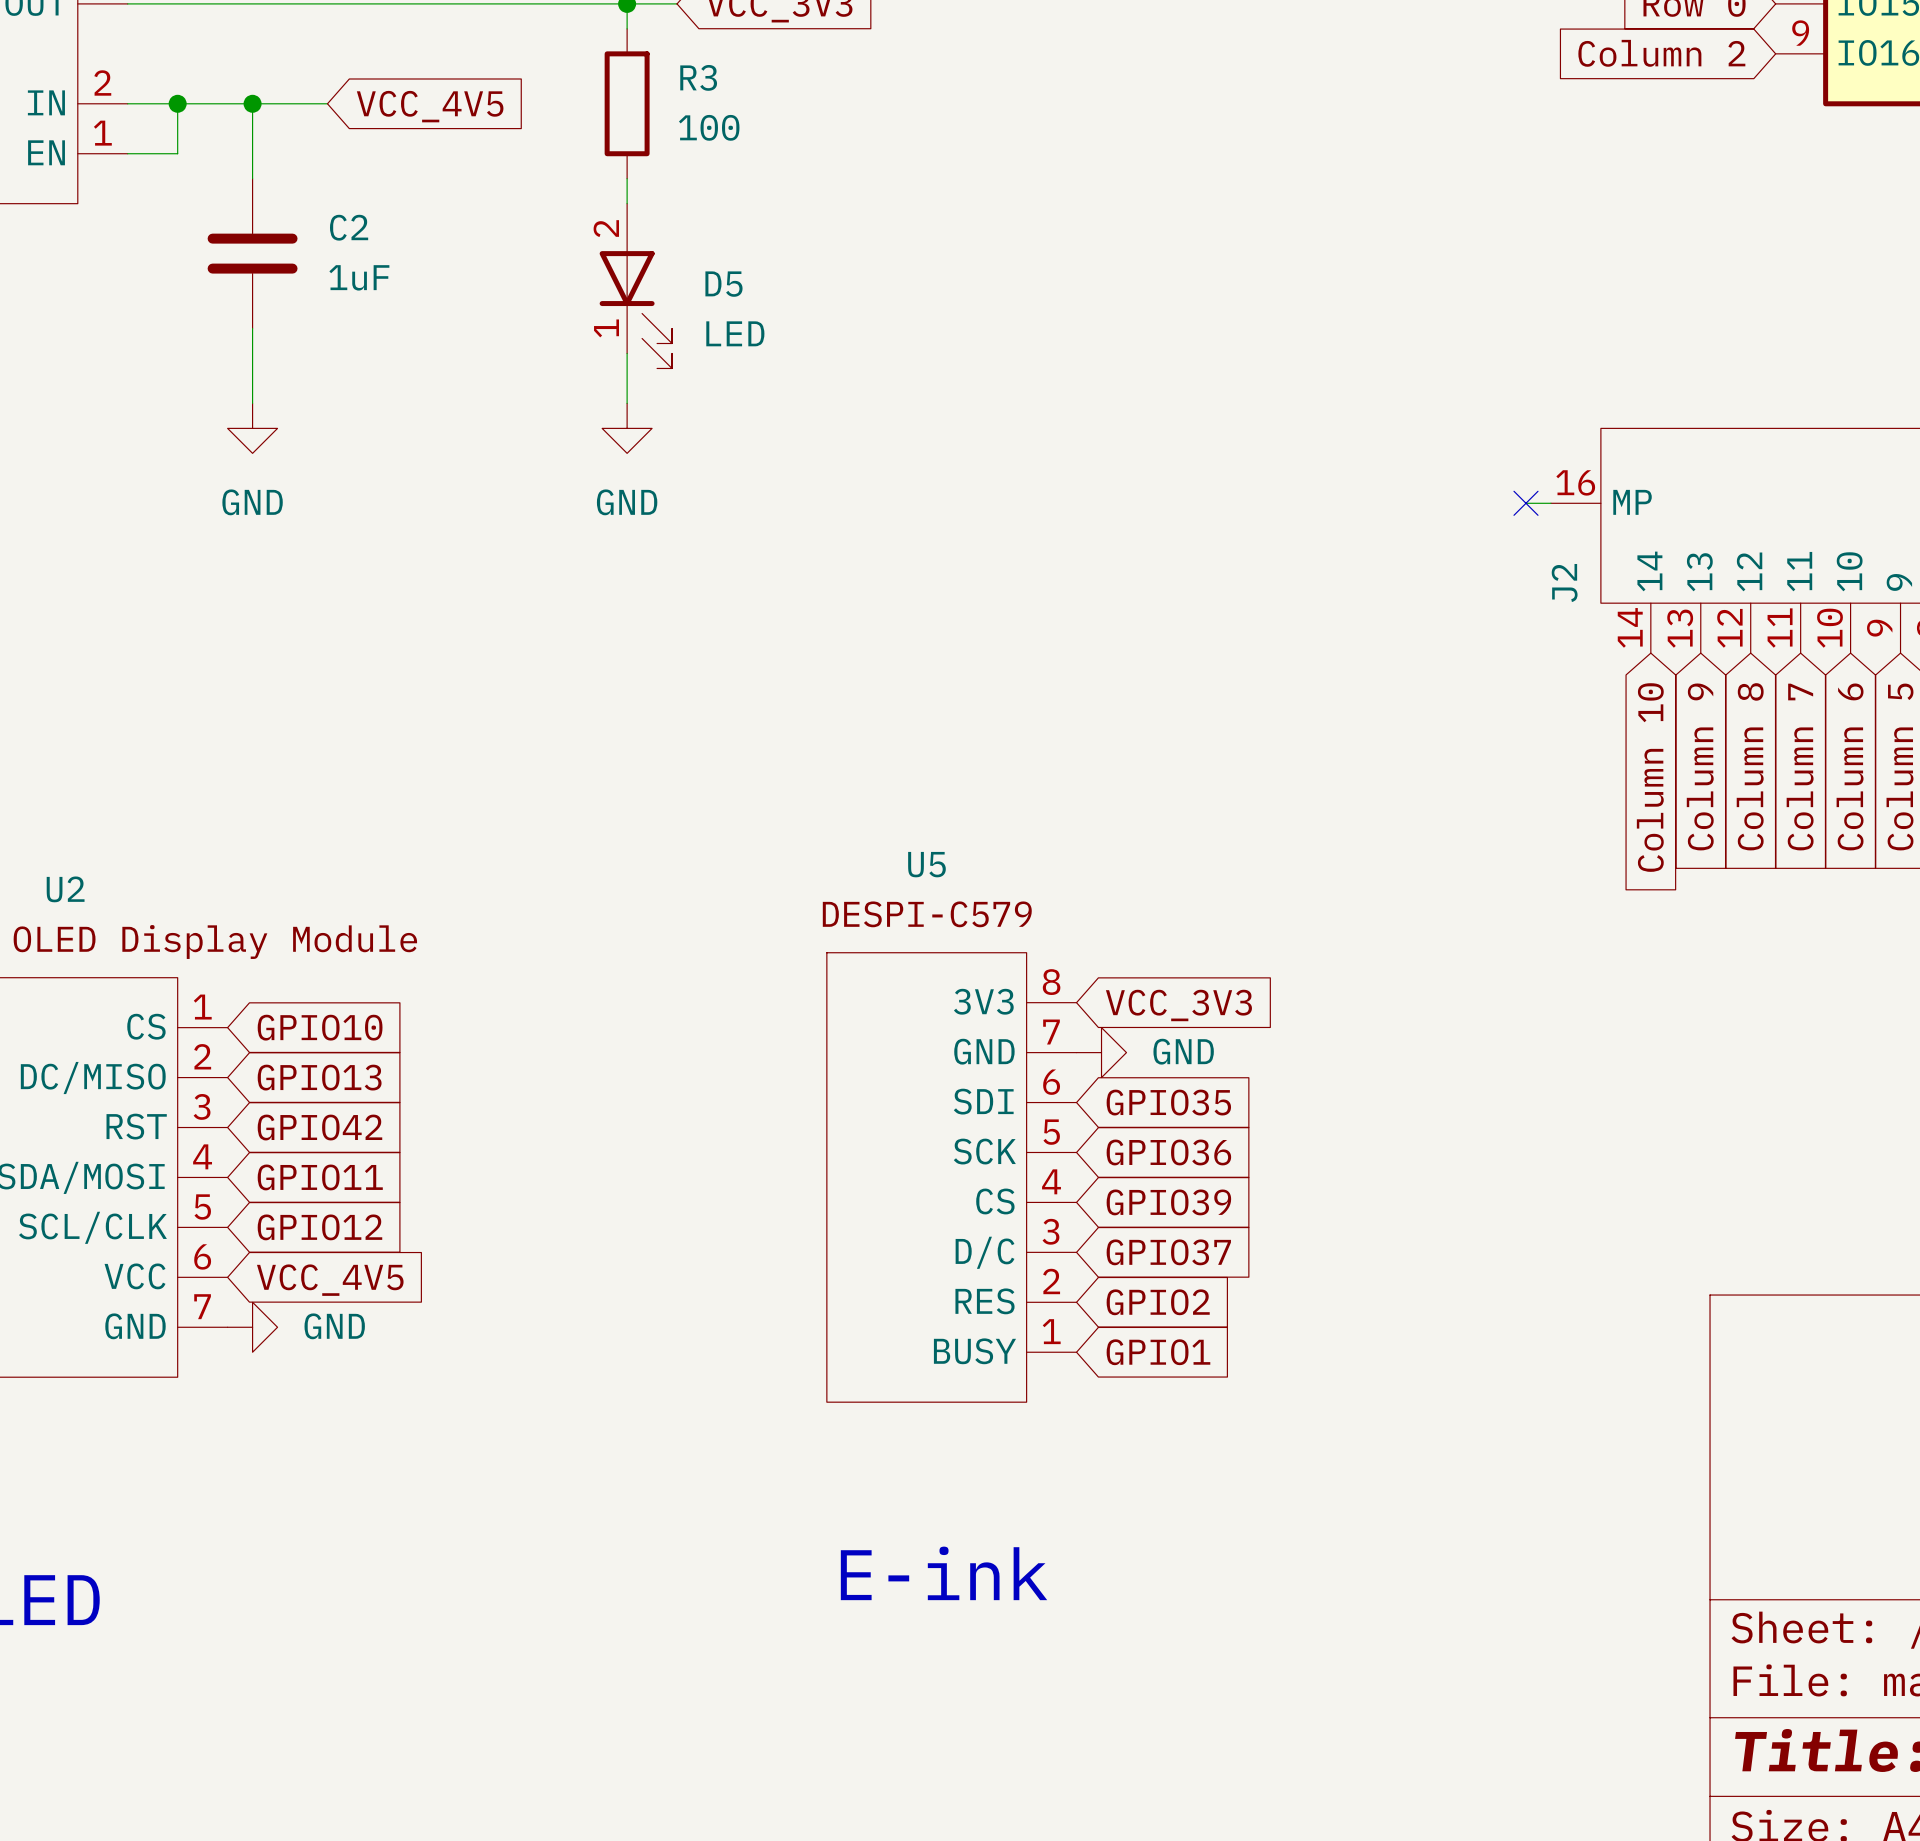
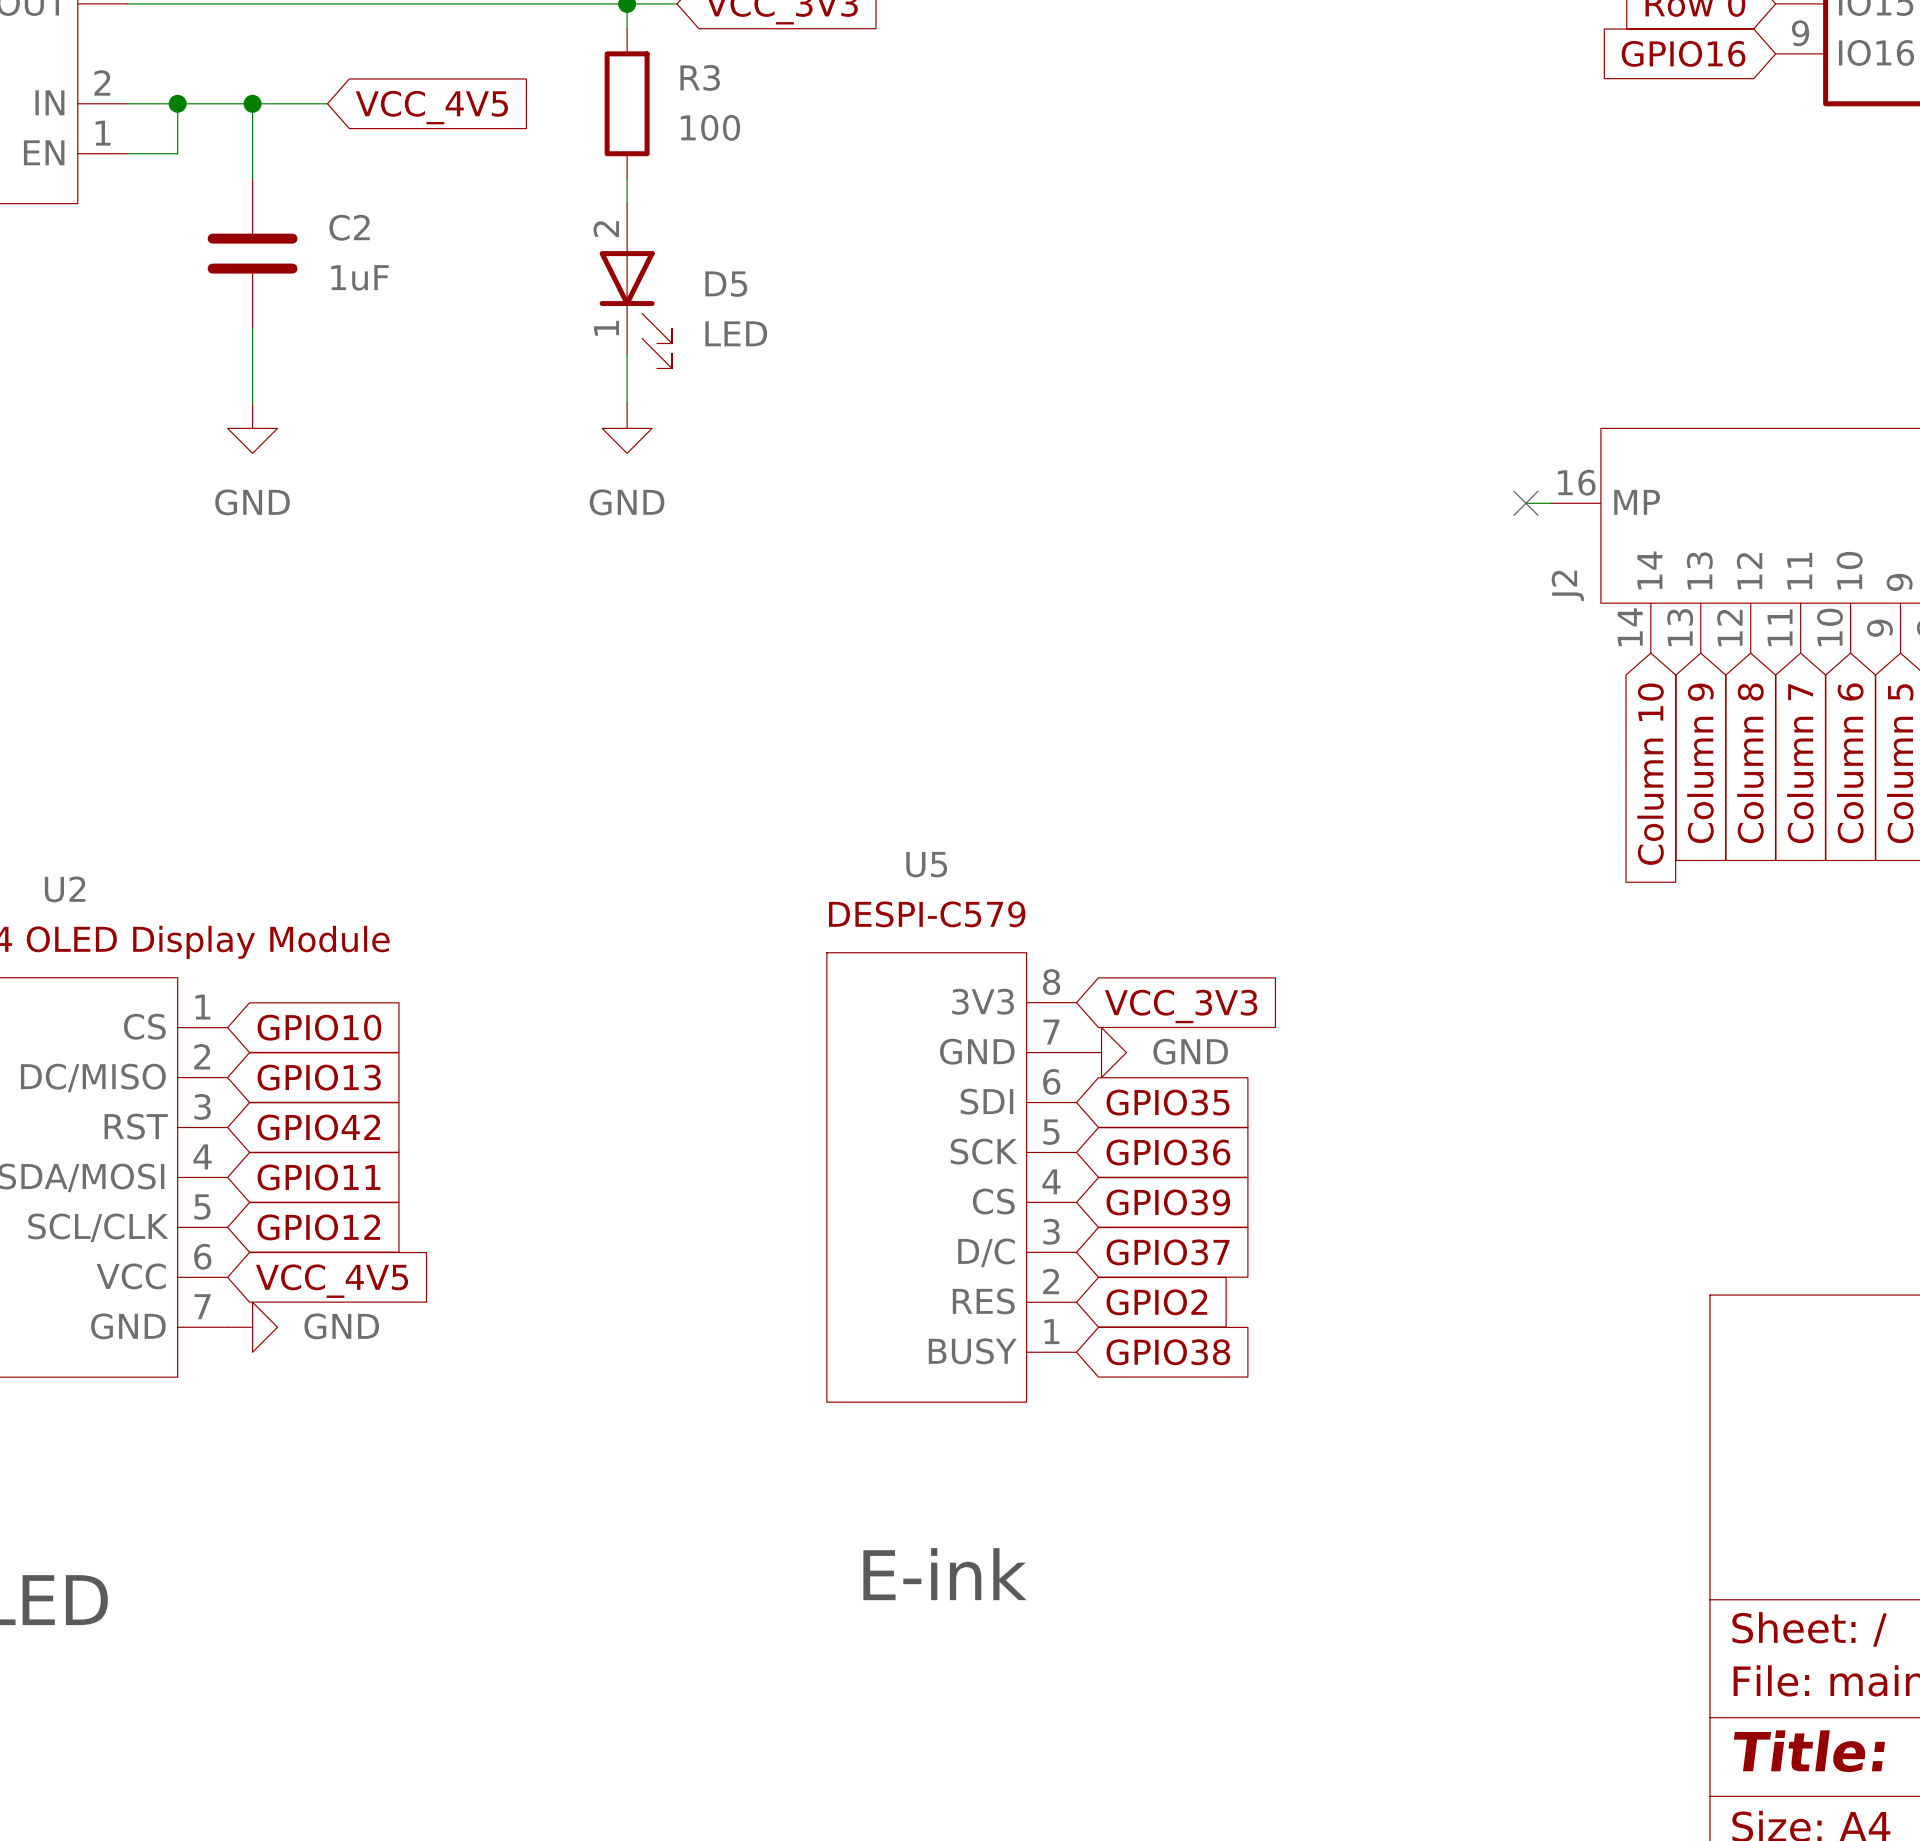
global label: Column 2 (1661, 53) -> GPIO16 (1683, 53)
global label: GPIO1 (1158, 1352) -> GPIO38 (1168, 1352)

